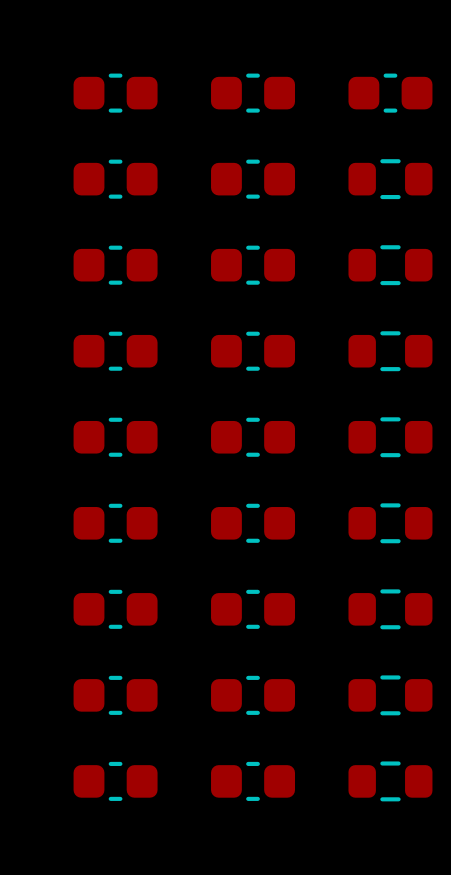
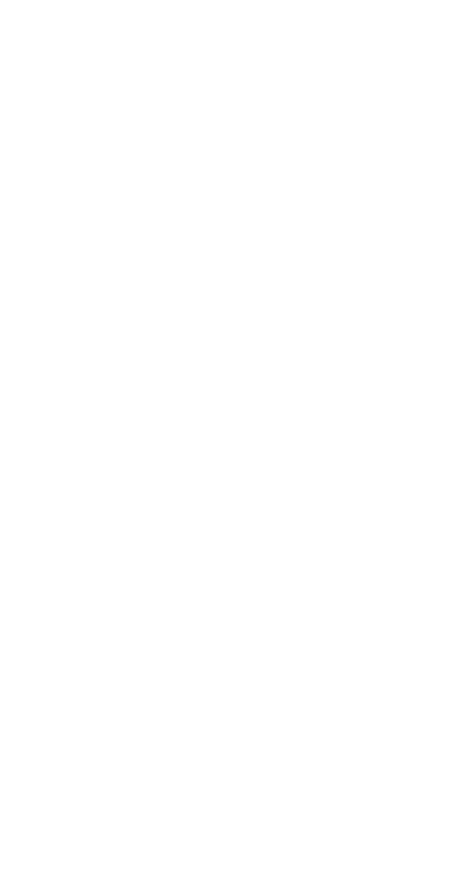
part: (115, 93) -> none
part: (253, 93) -> none
part: (390, 93) -> none
part: (115, 179) -> none
part: (253, 179) -> none
part: (390, 179) -> none
part: (115, 265) -> none
part: (253, 265) -> none
part: (390, 265) -> none
part: (115, 351) -> none
part: (253, 351) -> none
part: (390, 351) -> none
part: (115, 437) -> none
part: (253, 437) -> none
part: (390, 437) -> none
part: (115, 523) -> none
part: (253, 523) -> none
part: (390, 523) -> none
part: (115, 609) -> none
part: (253, 609) -> none
part: (390, 609) -> none
part: (115, 695) -> none
part: (253, 695) -> none
part: (390, 695) -> none
part: (115, 781) -> none
part: (253, 781) -> none
part: (390, 781) -> none

